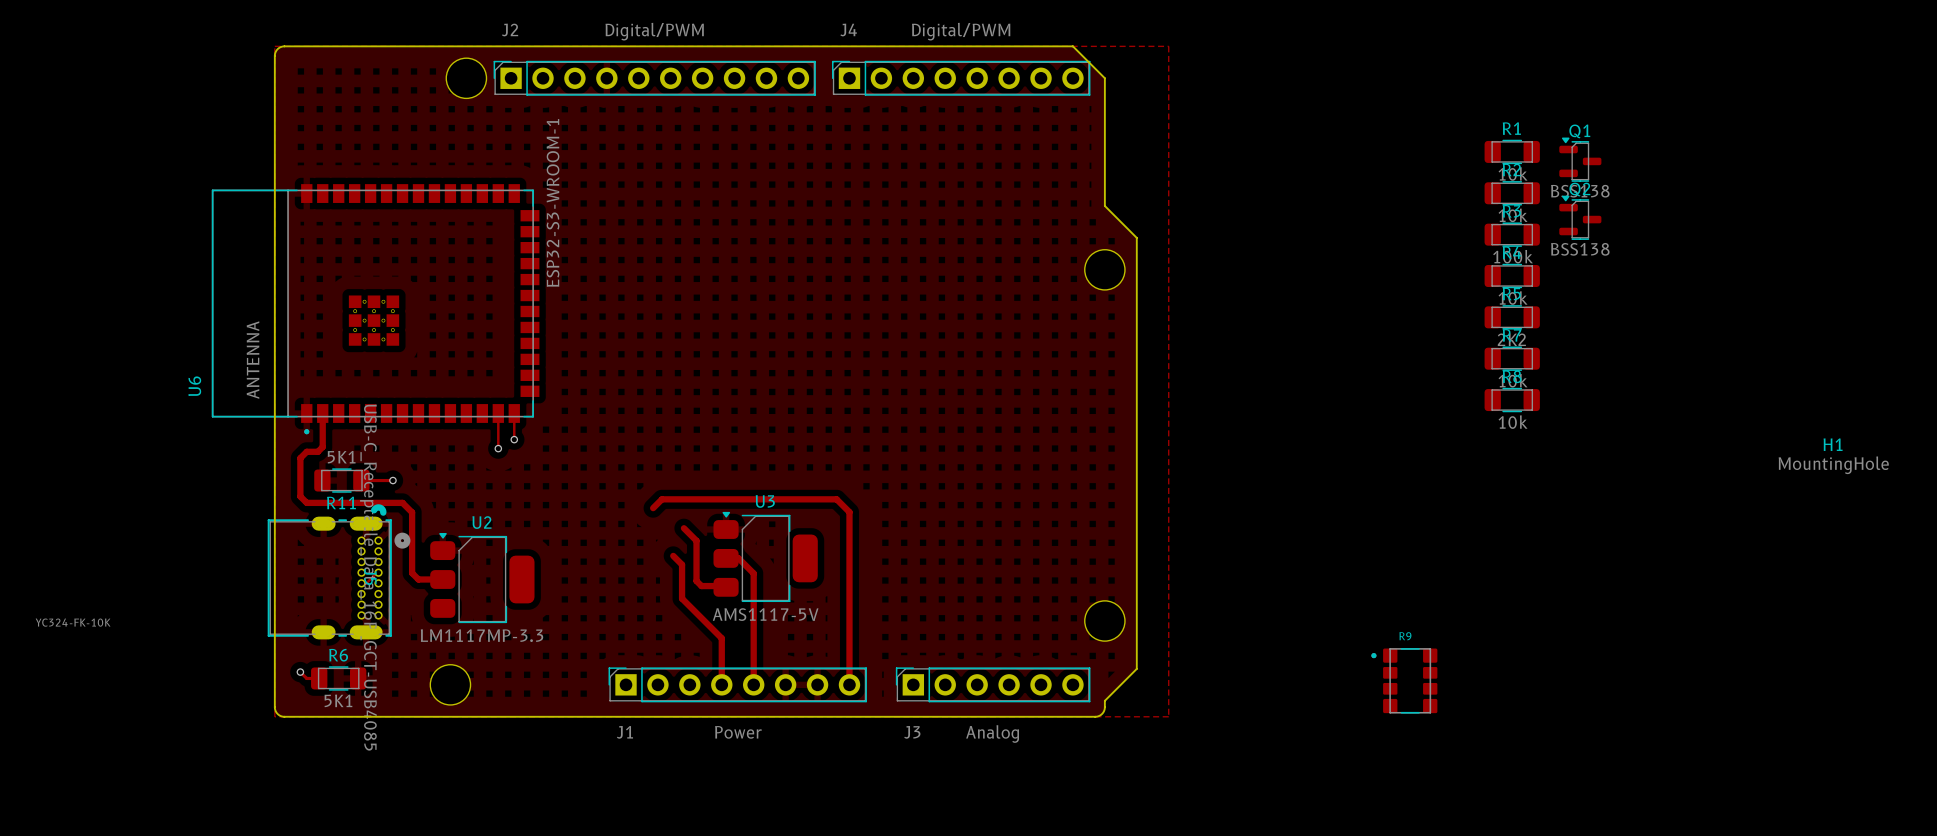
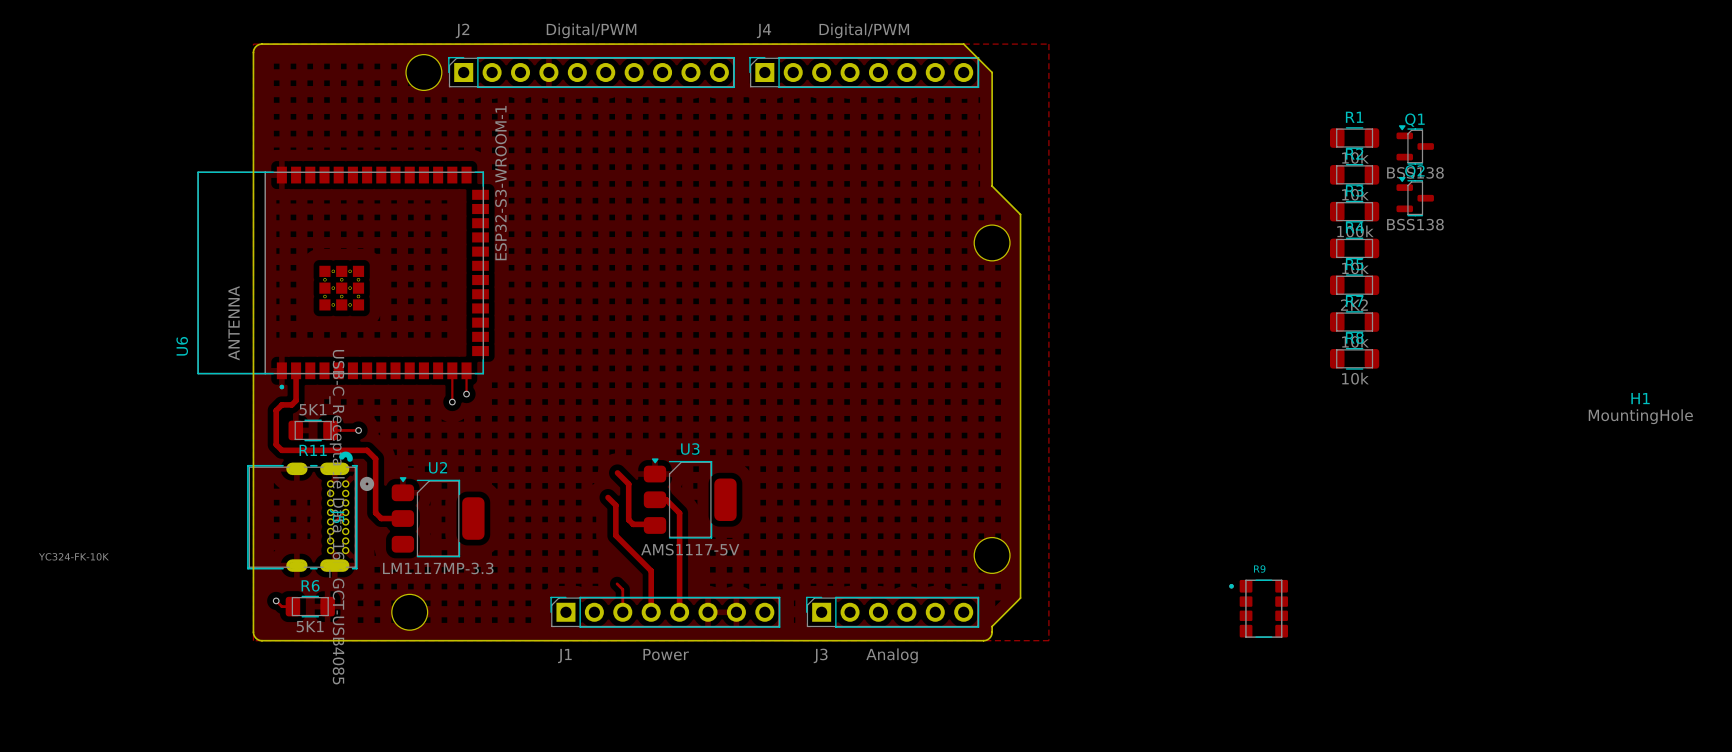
track: (653, 508) (661, 499) (836, 499) (849, 512) (849, 684) -> none
track: none -> (617, 583) (622, 589) (622, 612)

